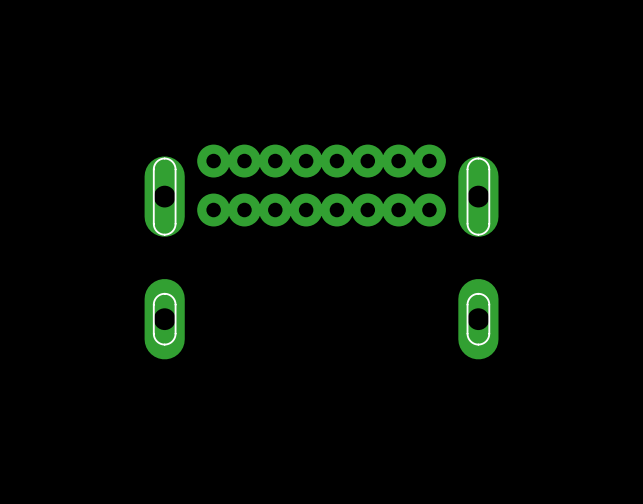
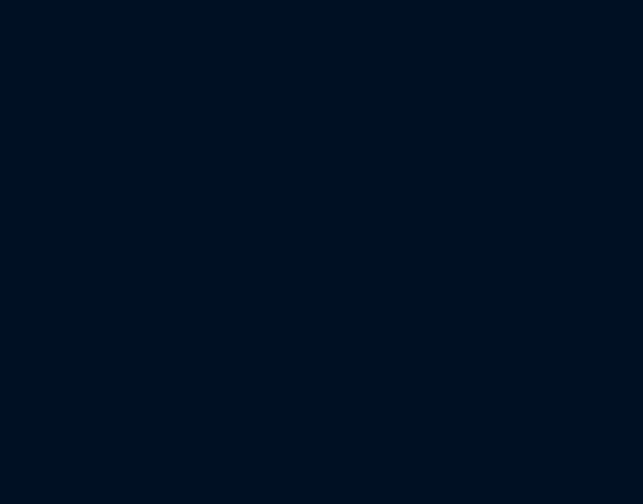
part: (321, 251) -> none

